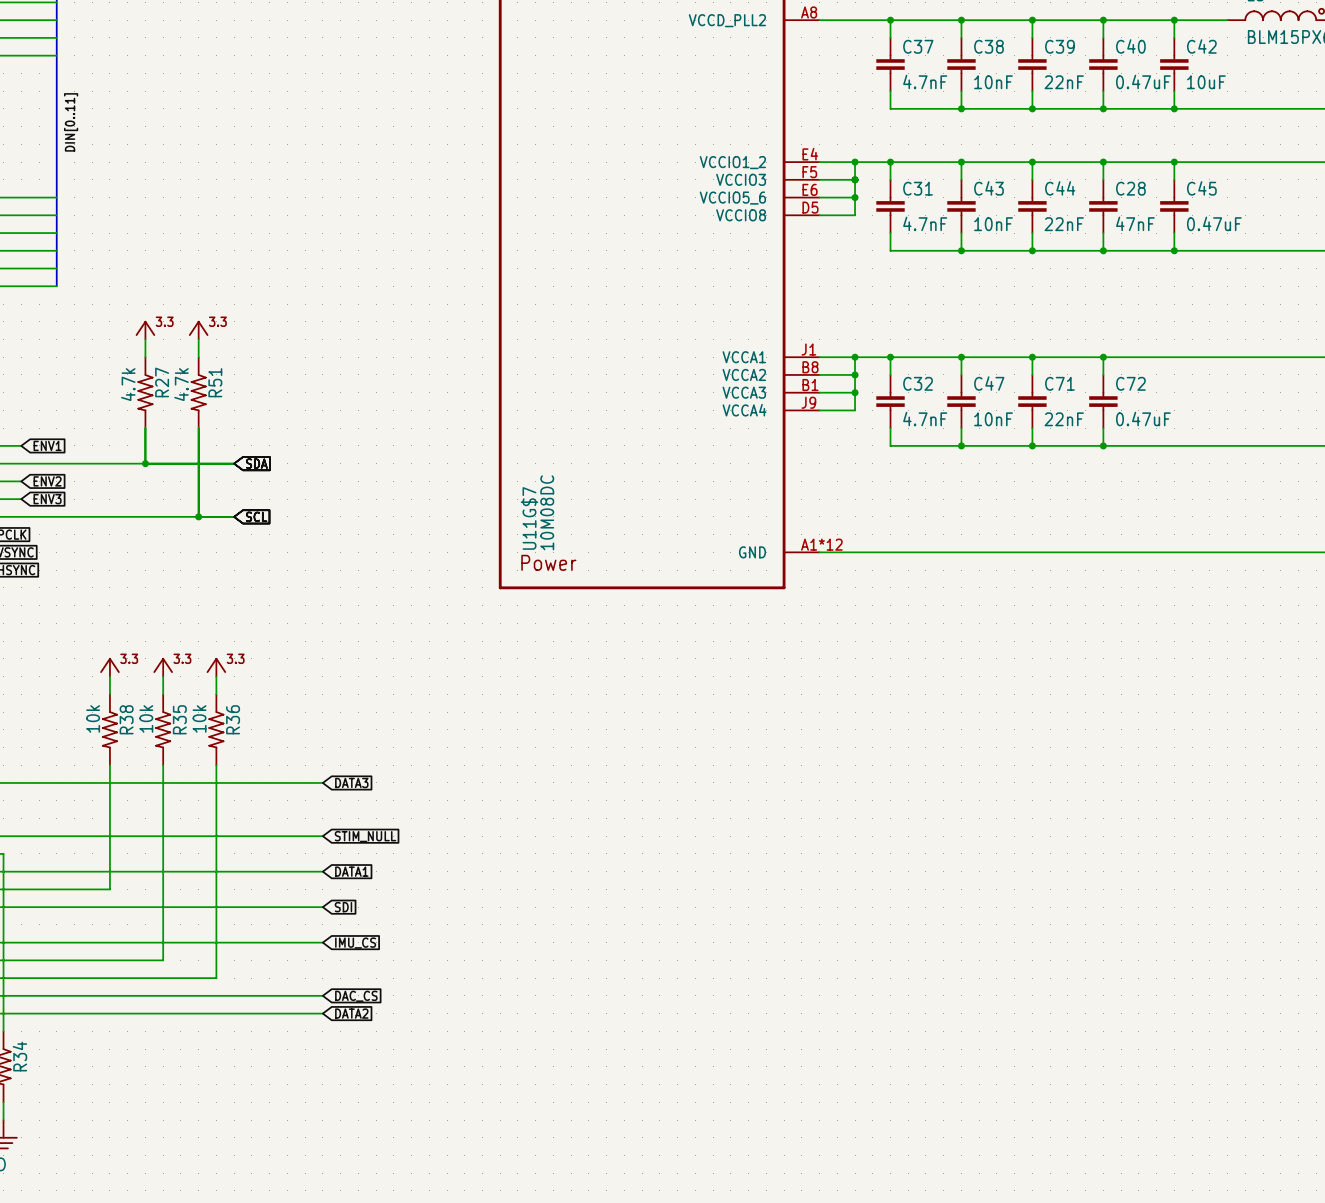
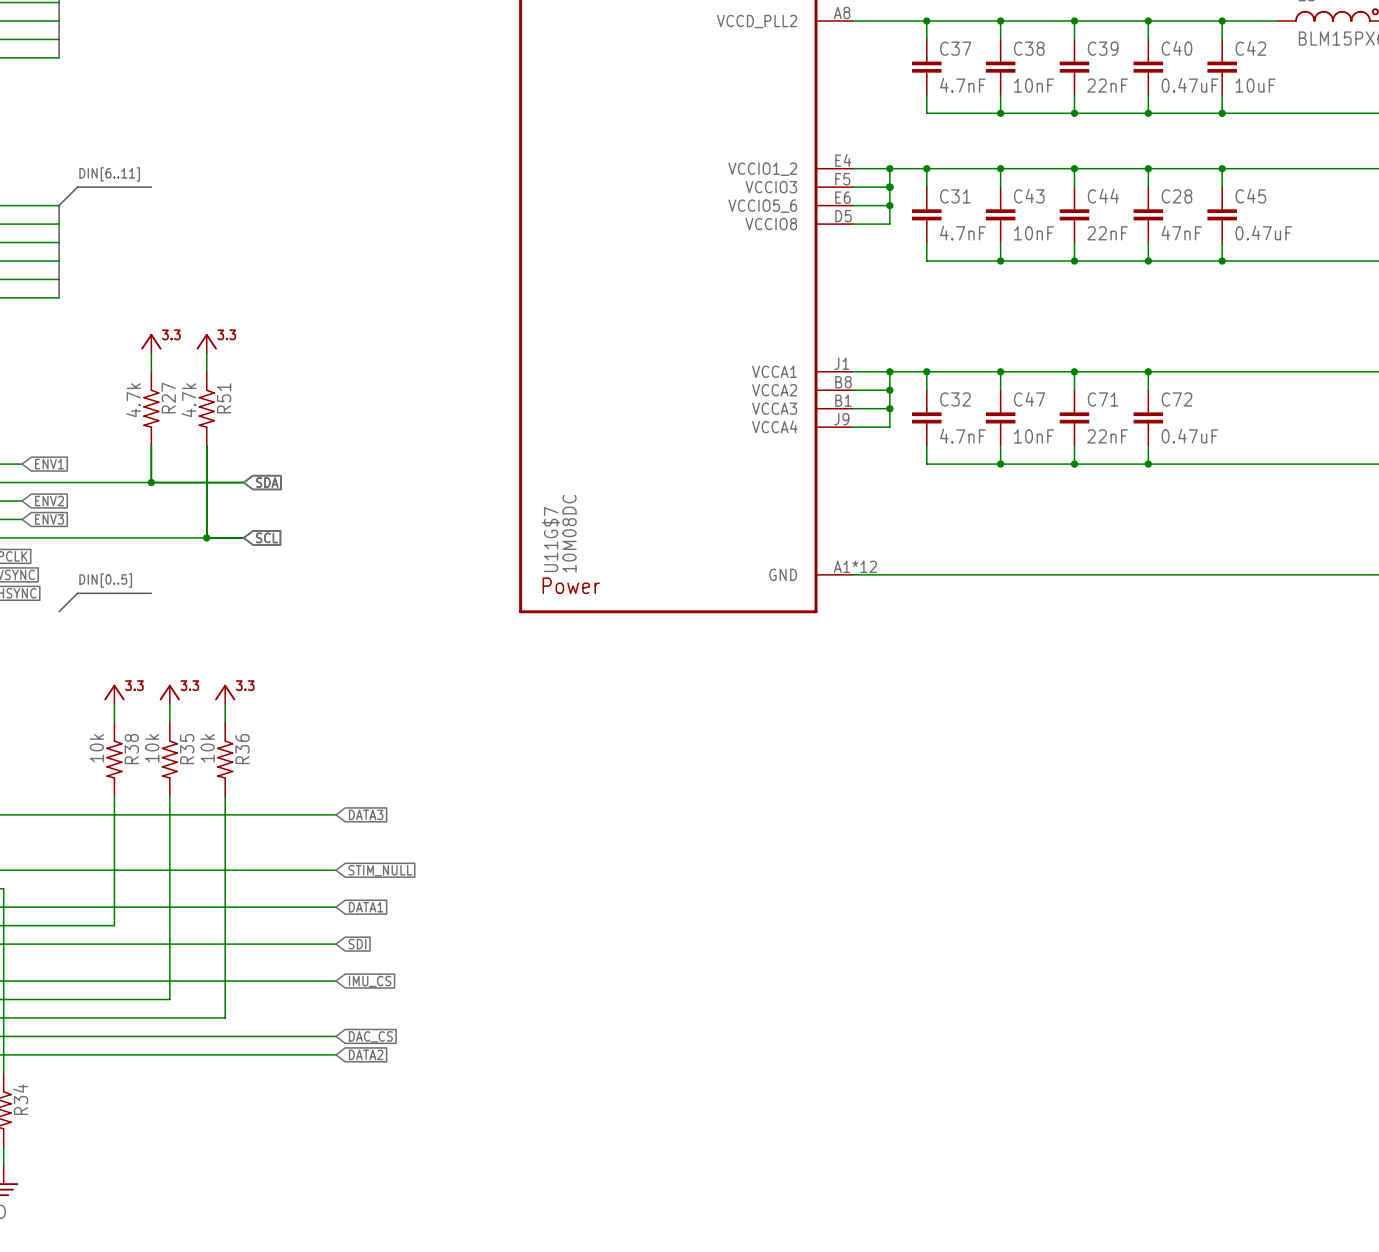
bus: (56, 55) (56, 197) -> (151, 187) (77, 187) (59, 205)
label: DIN[0..11] (71, 122) -> DIN[6..11] (109, 174)
label: none -> DIN[0..5] (105, 580)
bus: none -> (151, 593) (77, 593) (59, 611)

